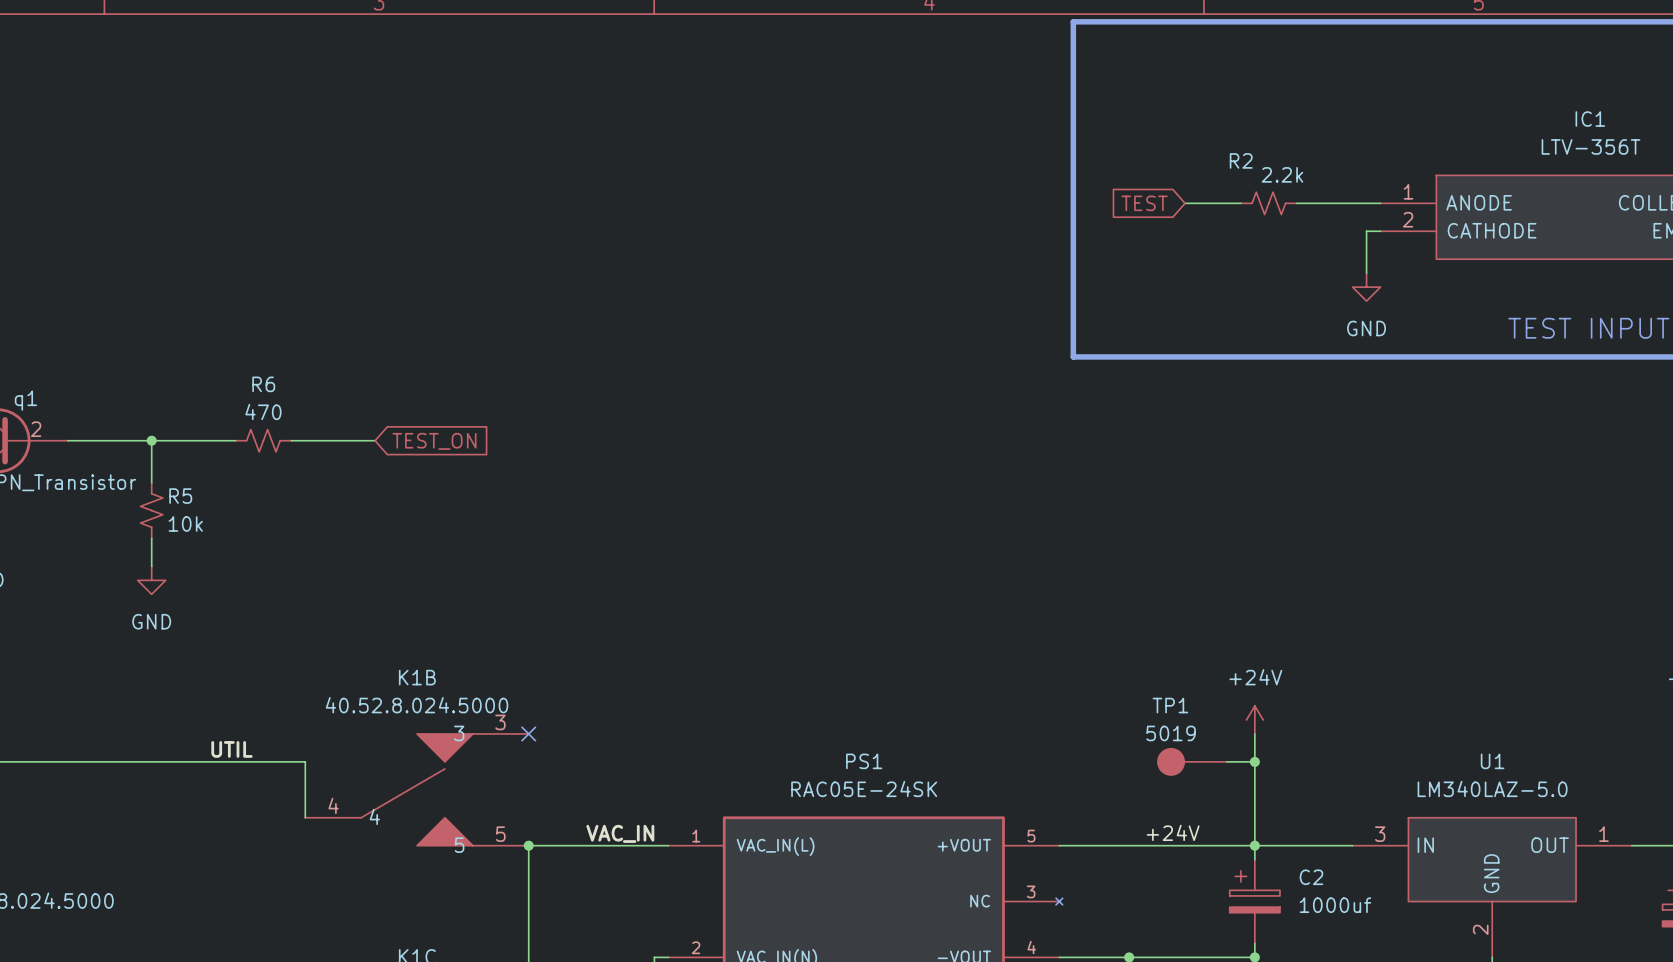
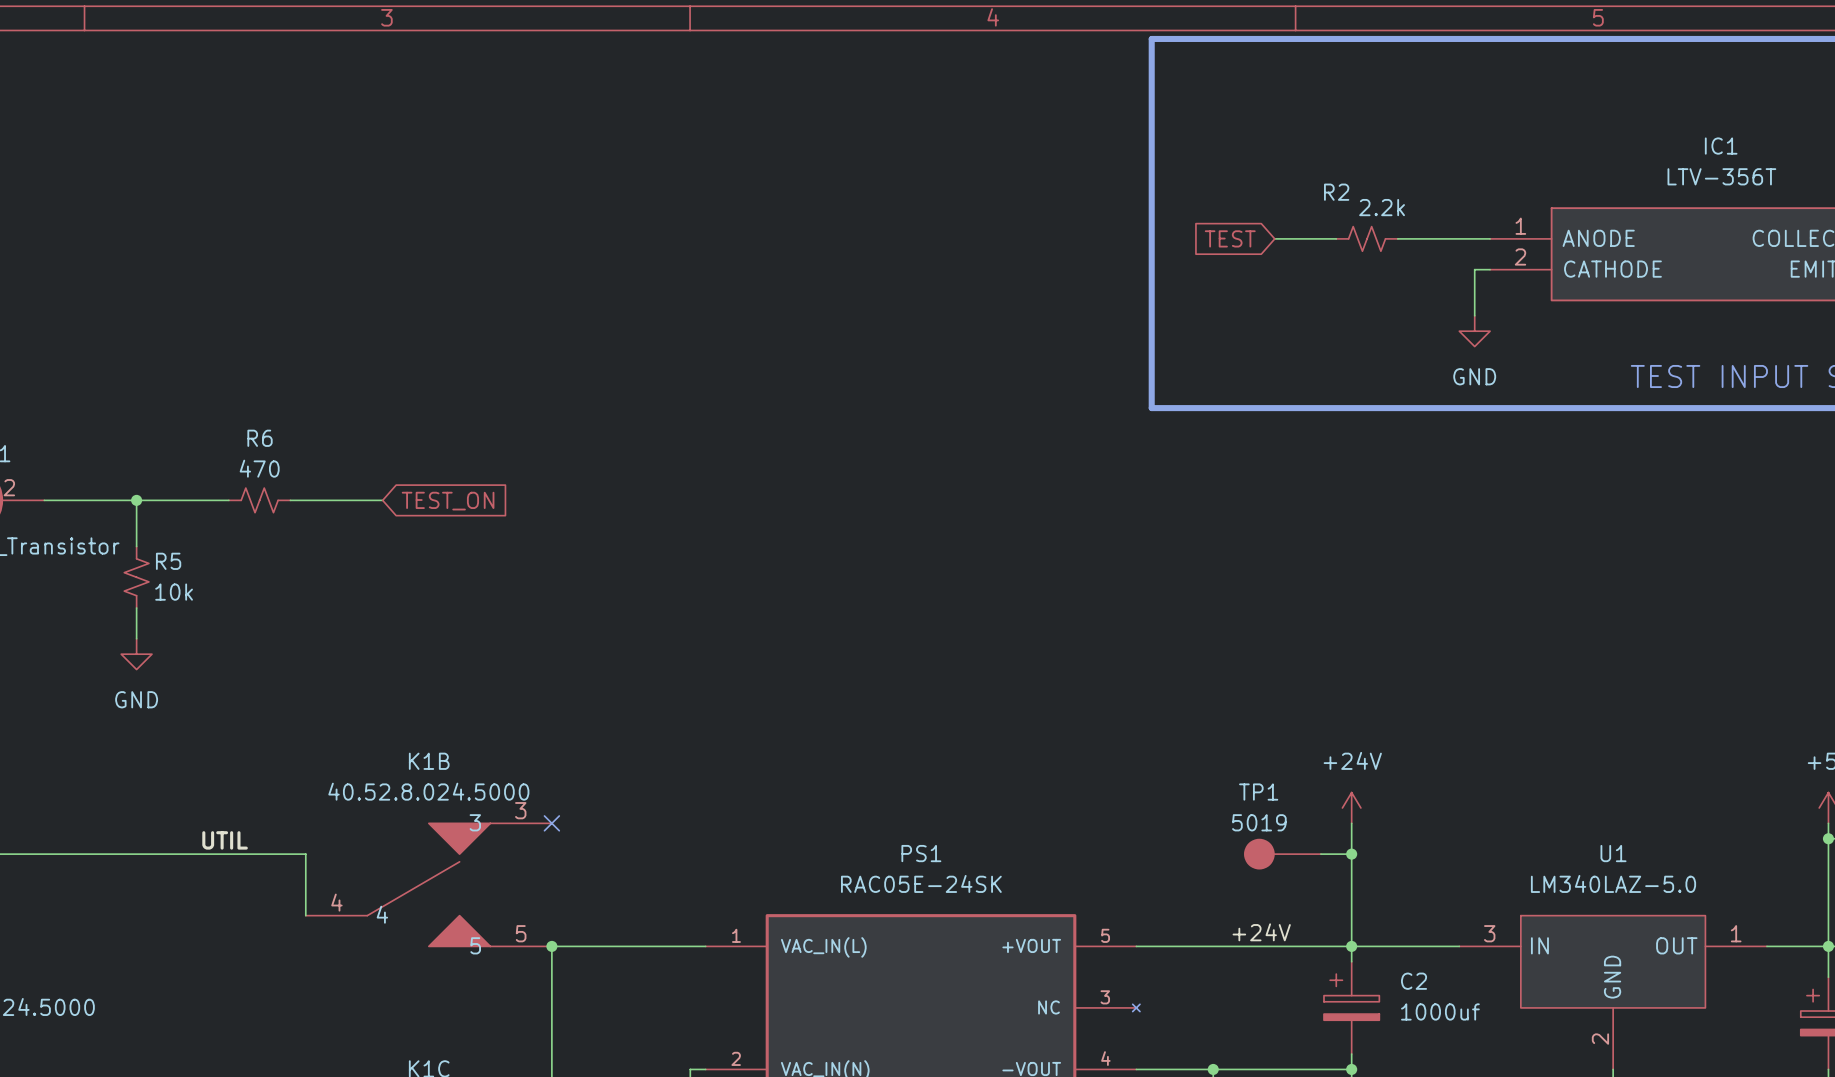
label: VAC_IN (620, 833) -> none

